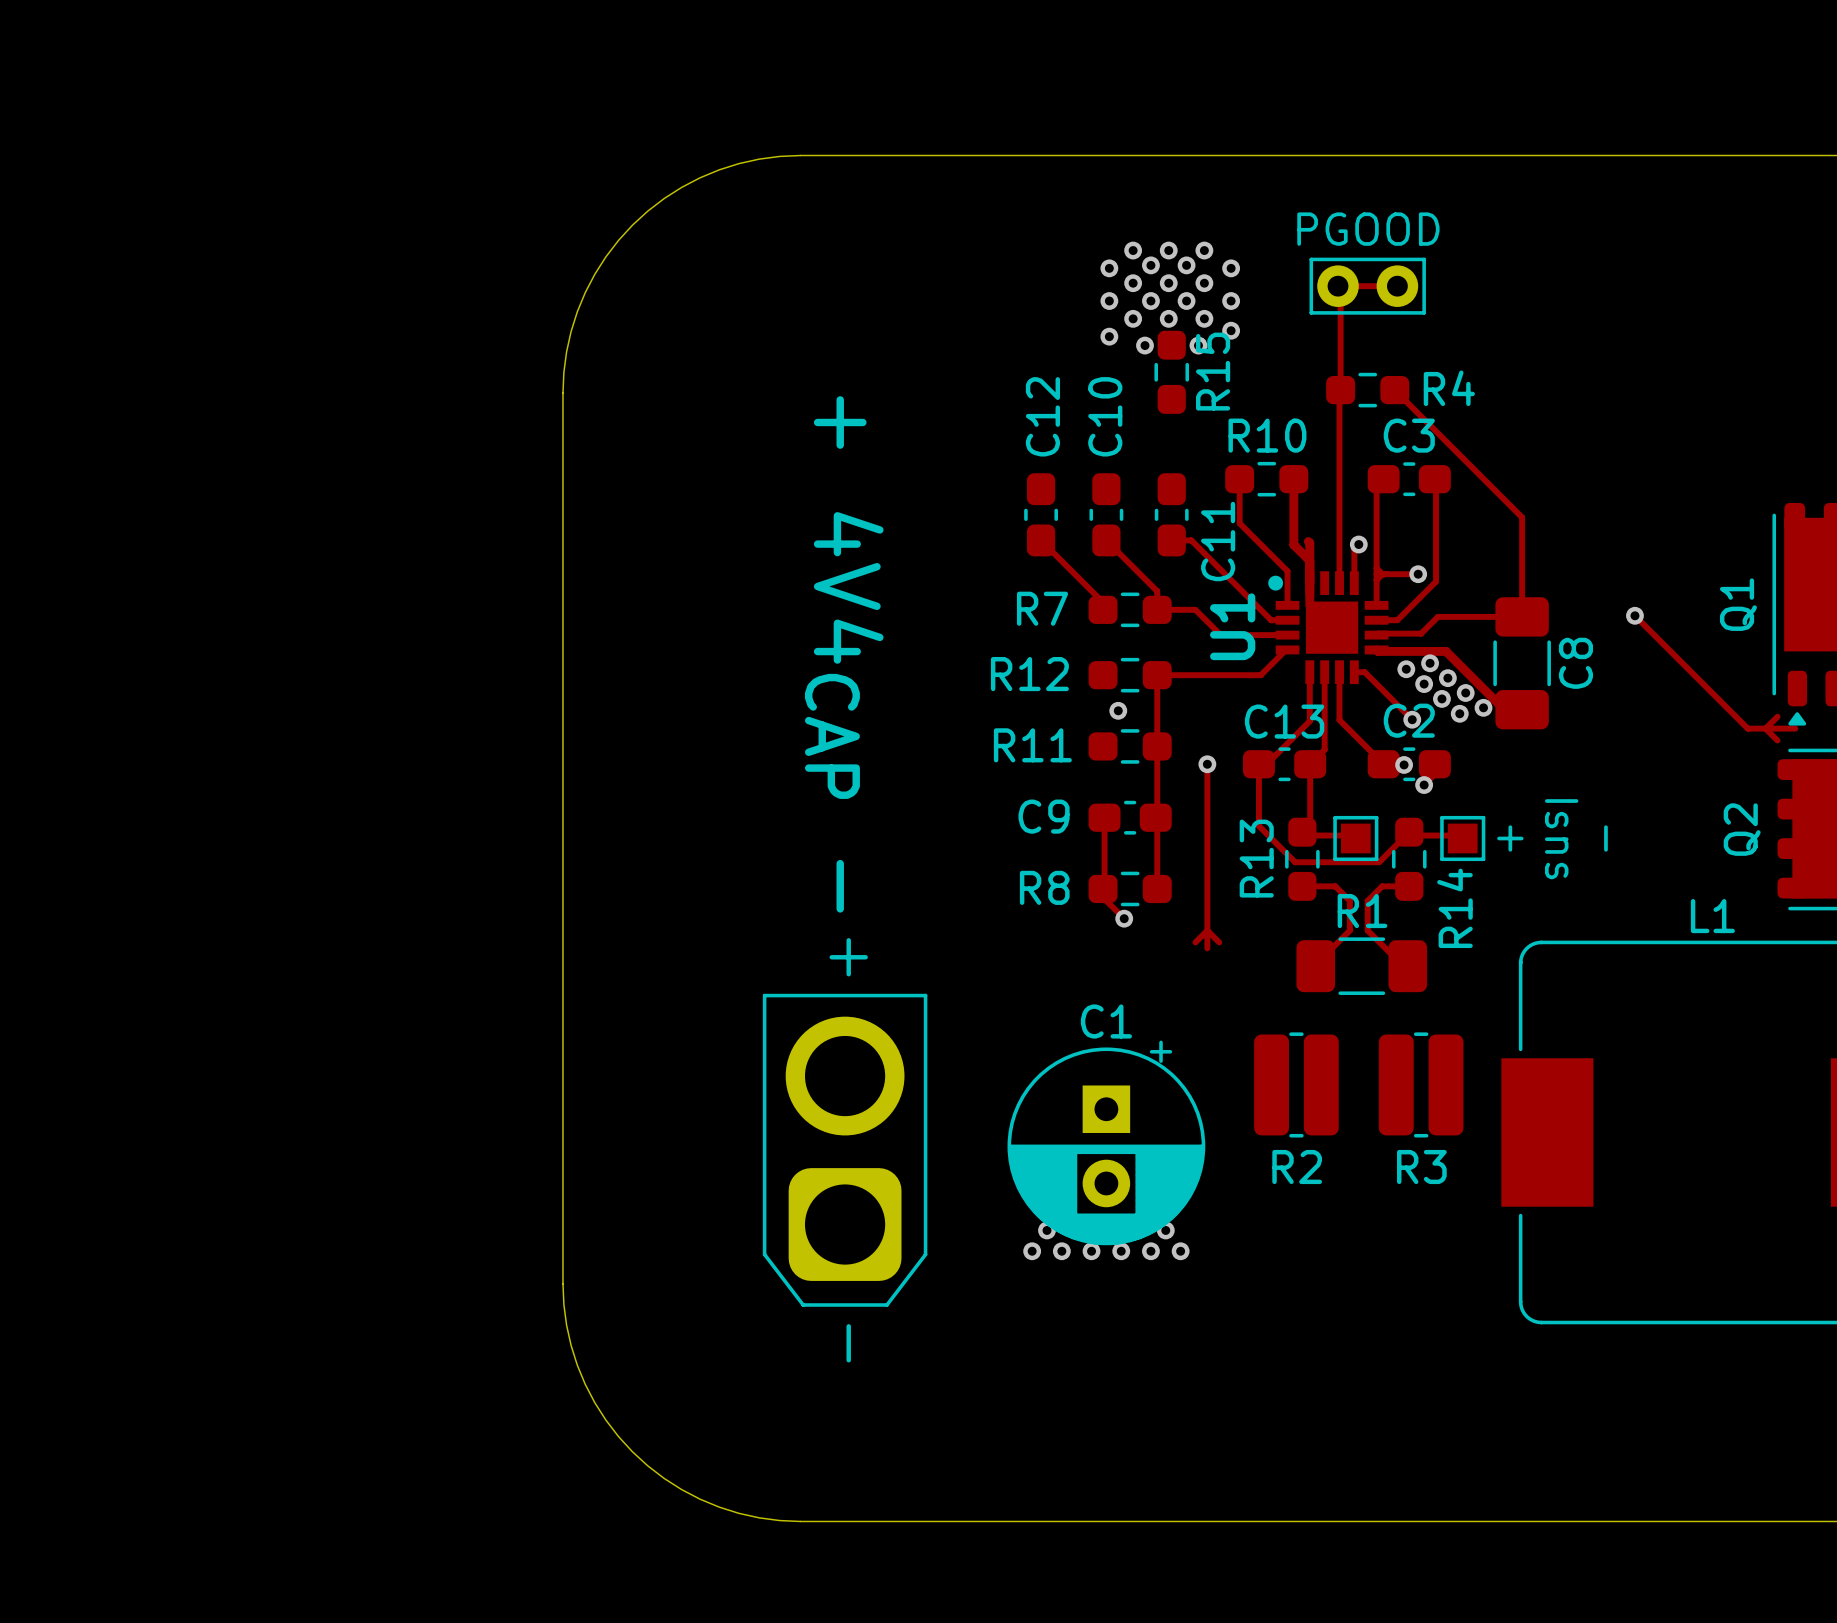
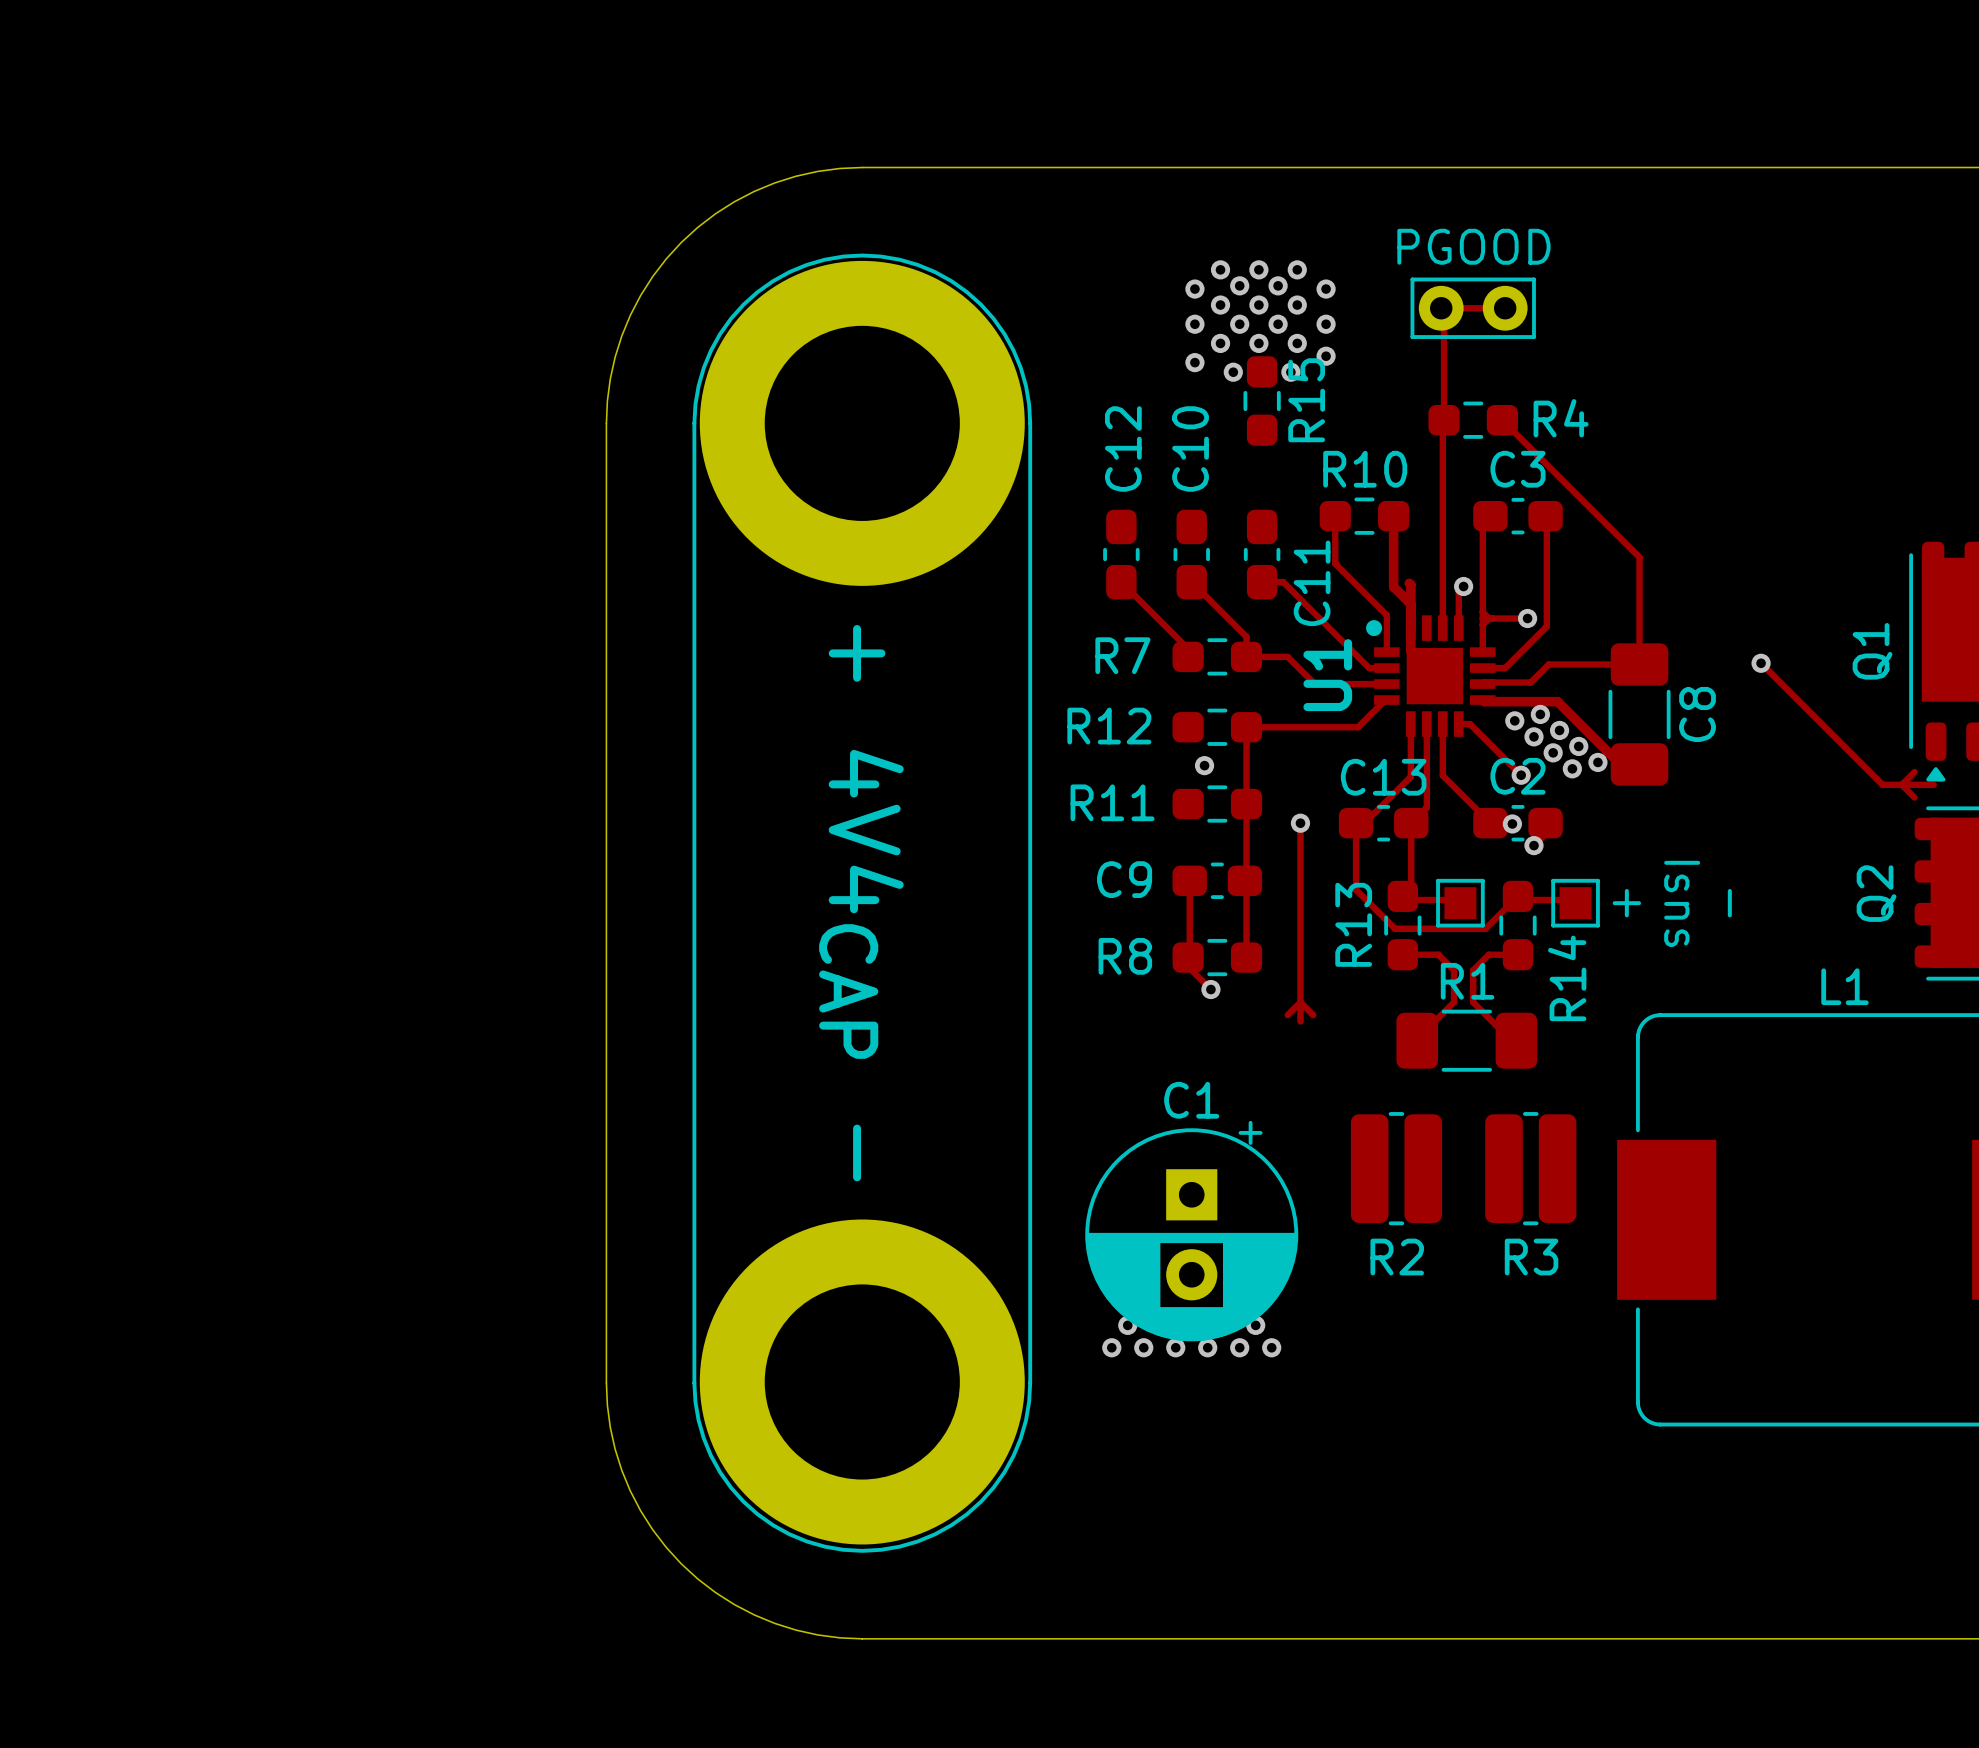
text position: + 4V4CAP - (844, 654) -> + 4V4CAP - (861, 903)
part: none -> (862, 903)
part: (845, 1150) -> none

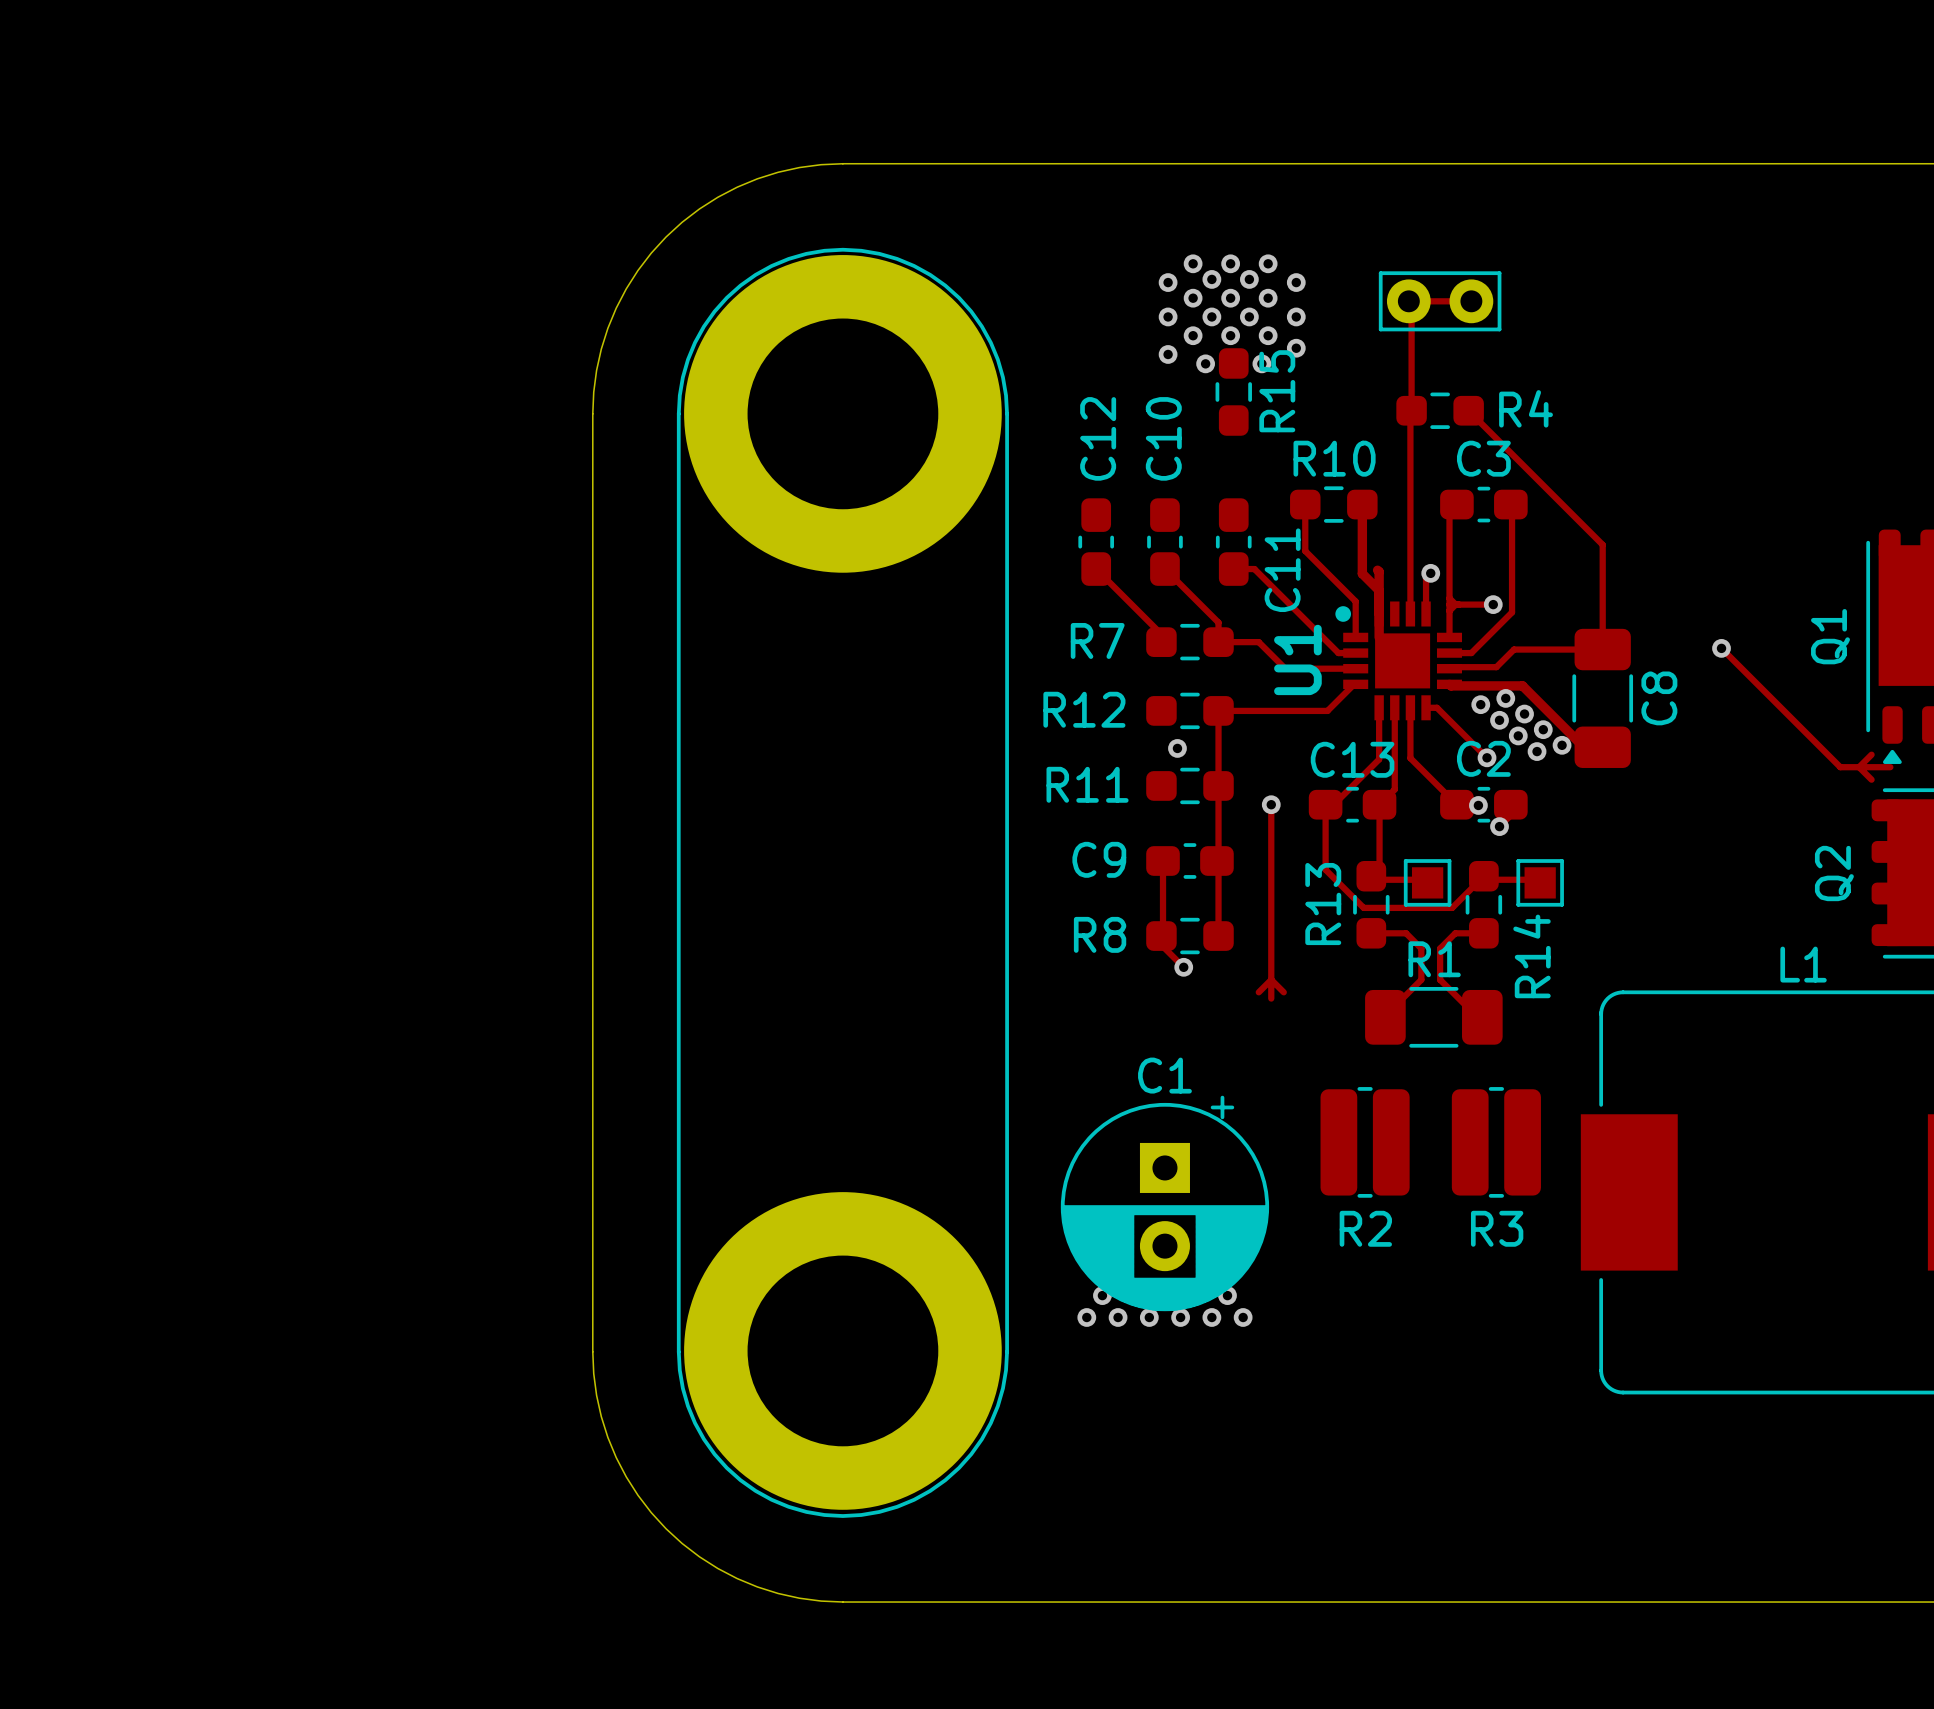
text: PGOOD (1473, 246) -> none
text: + 4V4CAP - (861, 903) -> none
text: + (1626, 903) -> none
text: Isns (1682, 903) -> none
text: - (1729, 903) -> none

